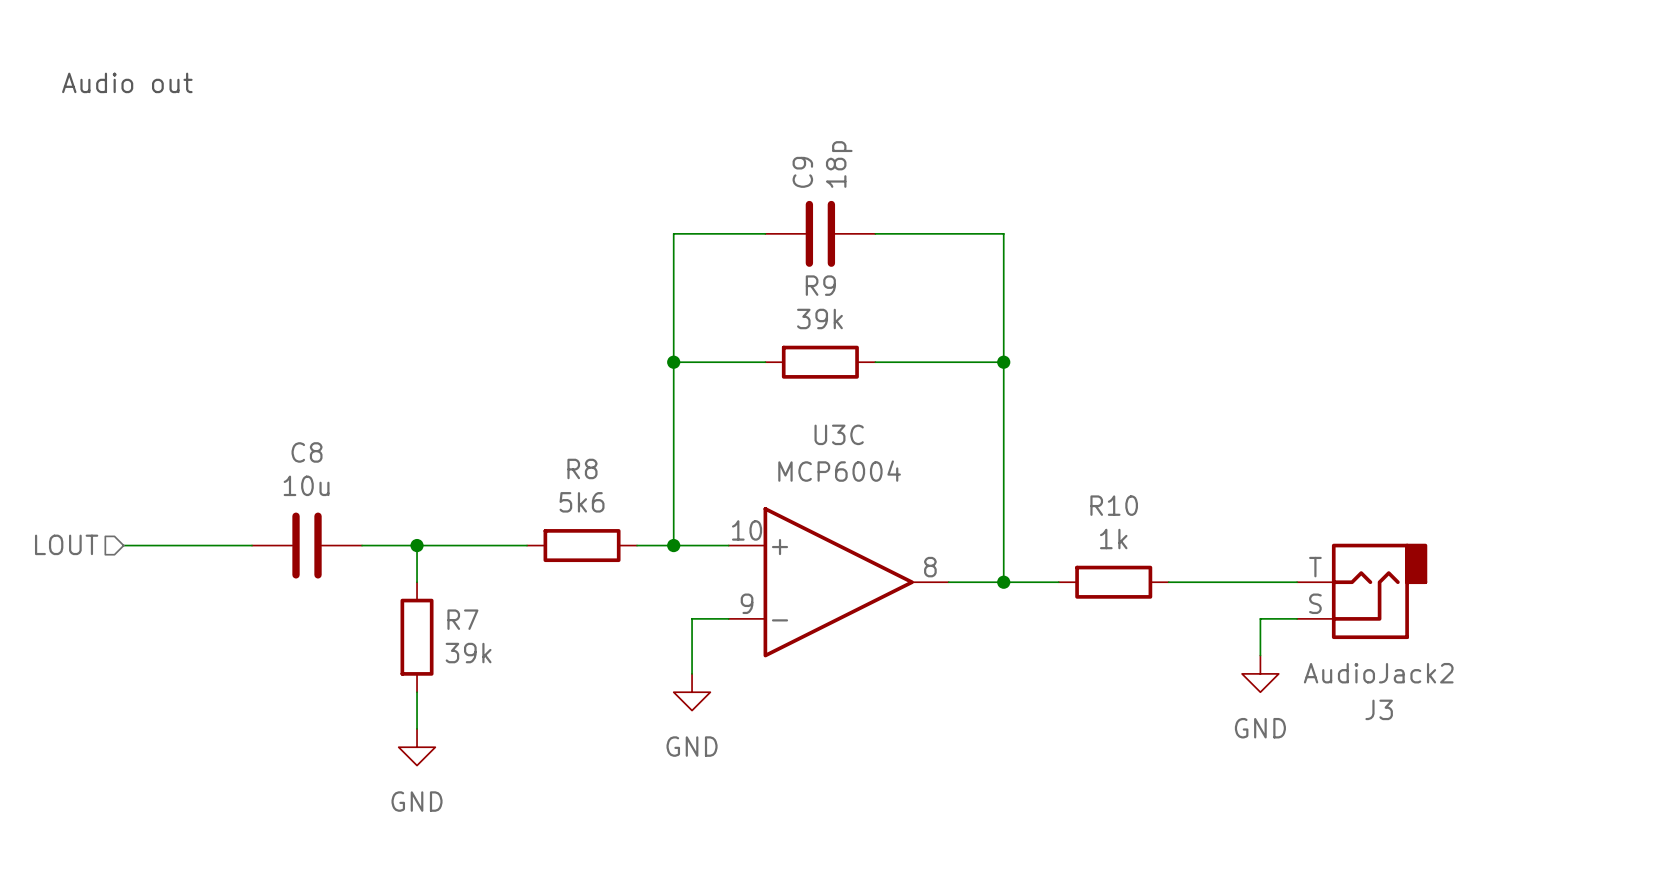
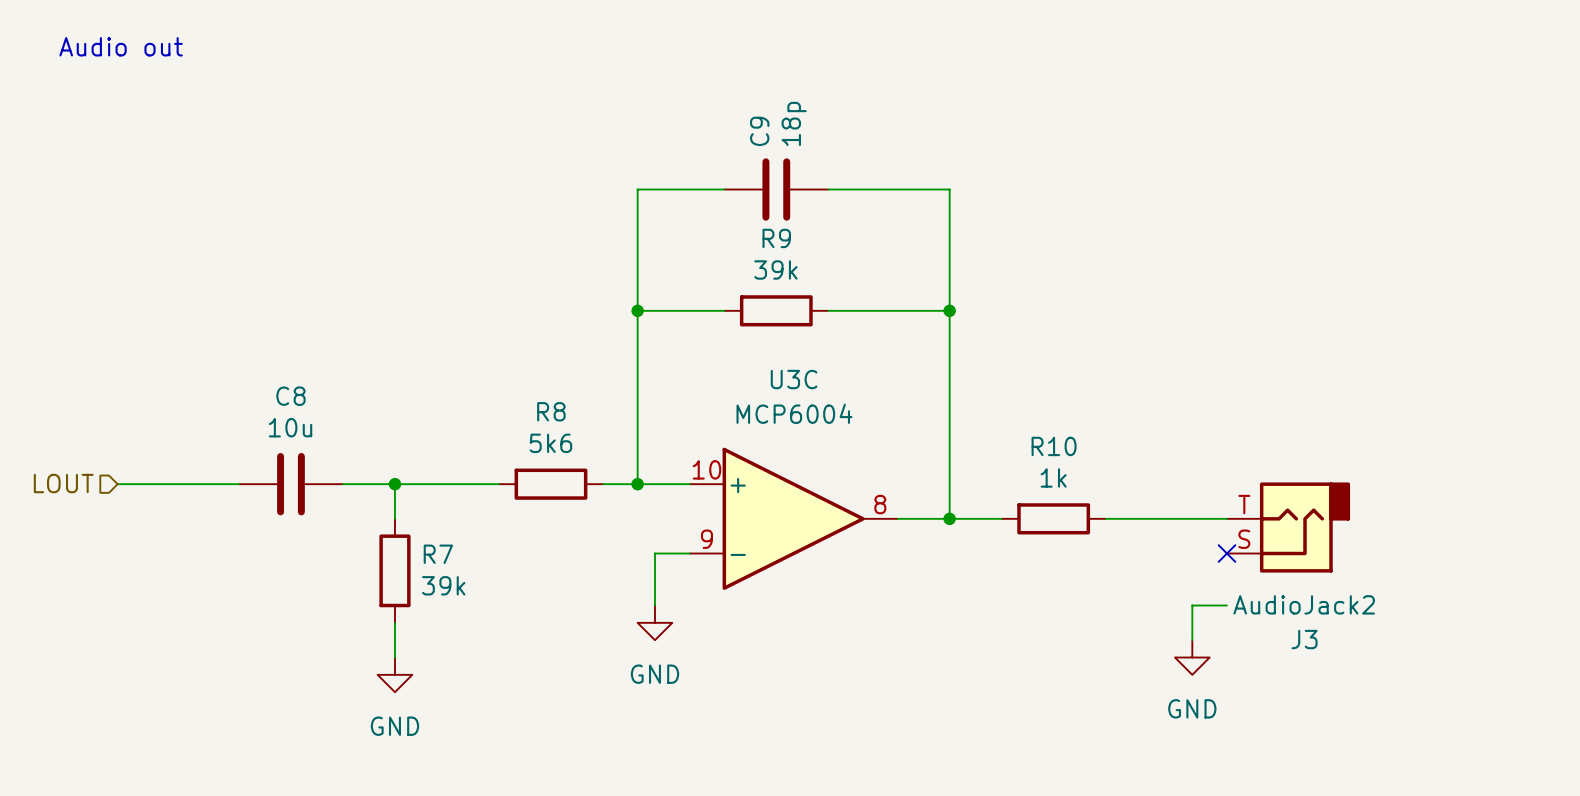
wire: (1297, 618) (1260, 618) (1260, 655) -> (1226, 605) (1192, 605) (1192, 640)
no-connect mark: none -> (1226, 553)
power symbol position: GND (1260, 673) -> GND (1192, 657)

